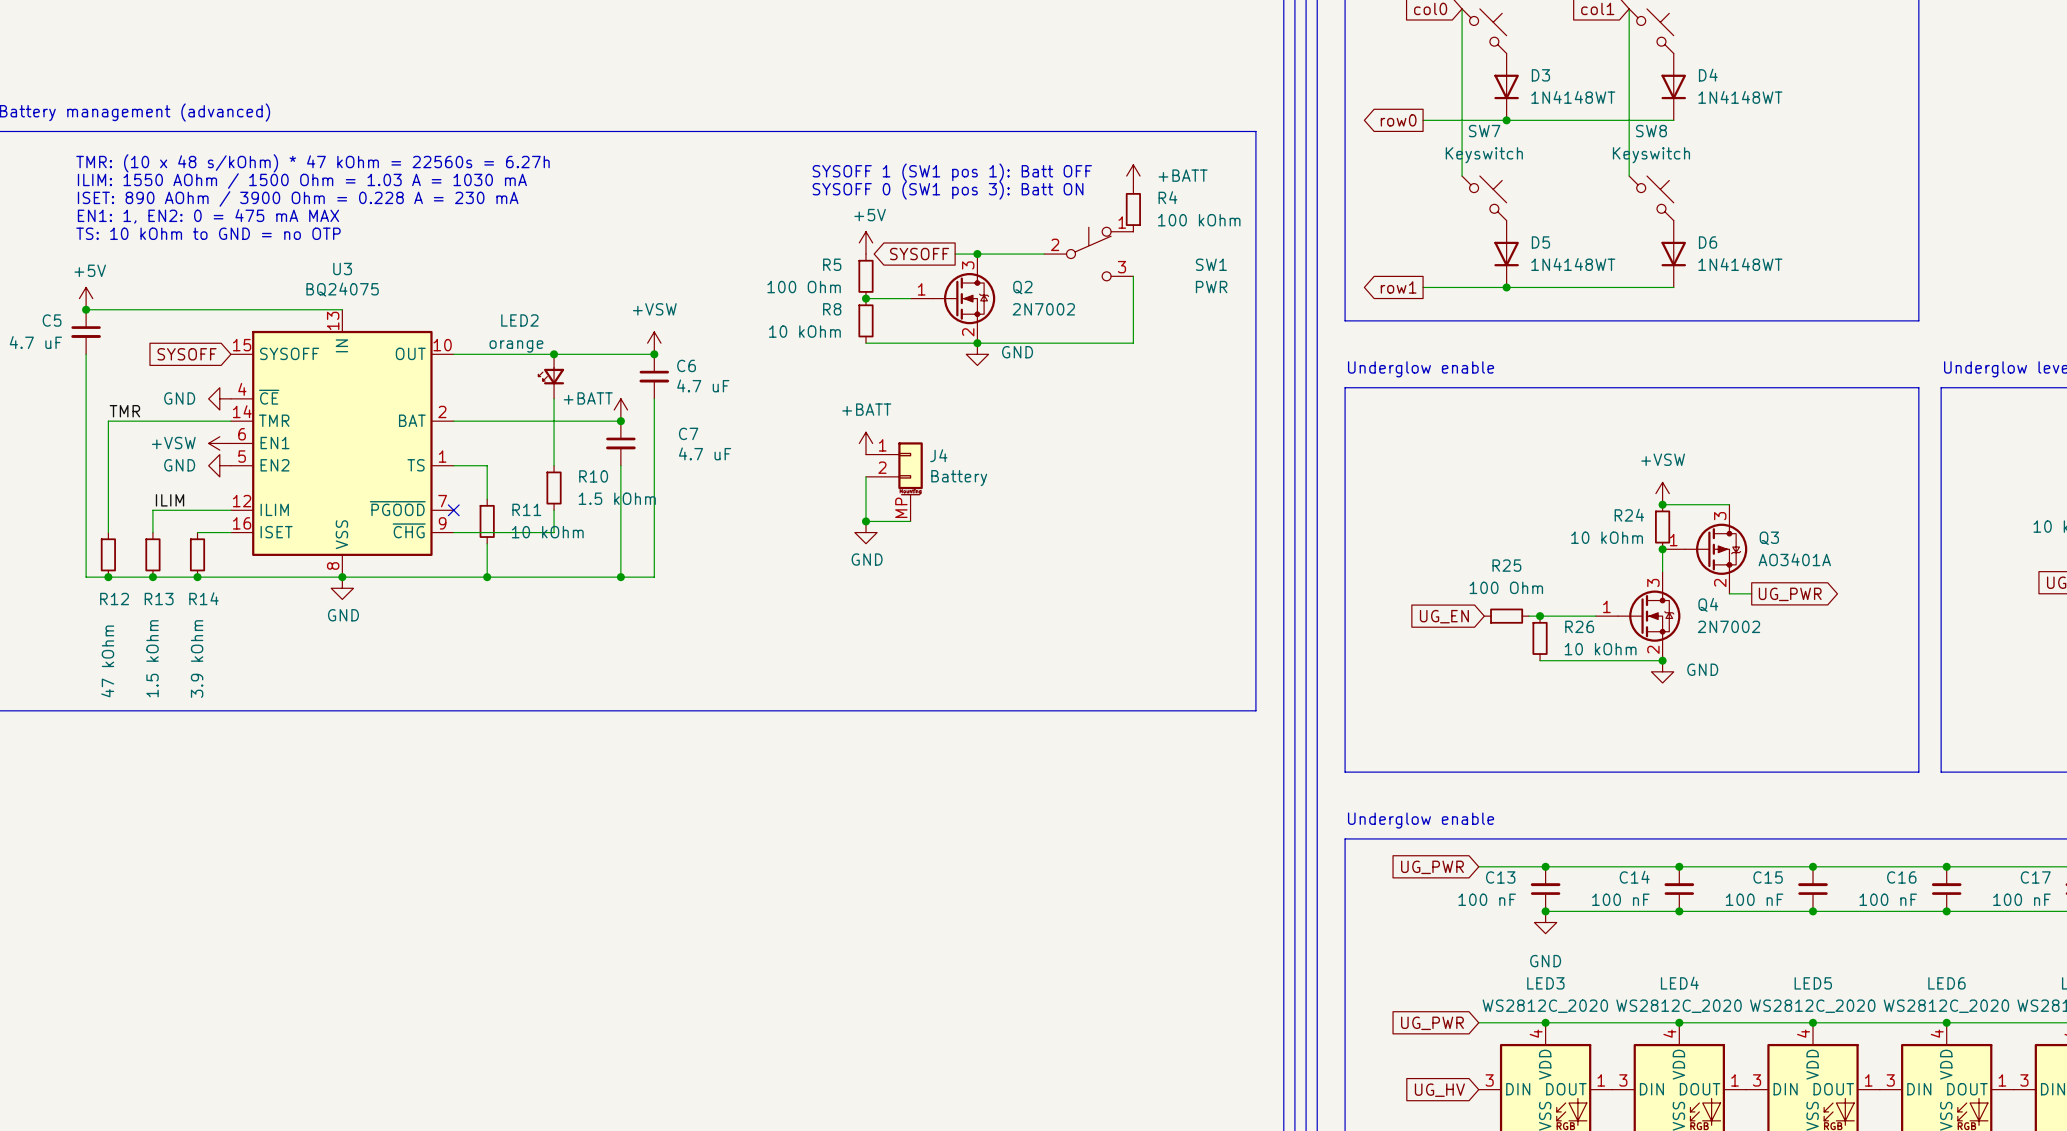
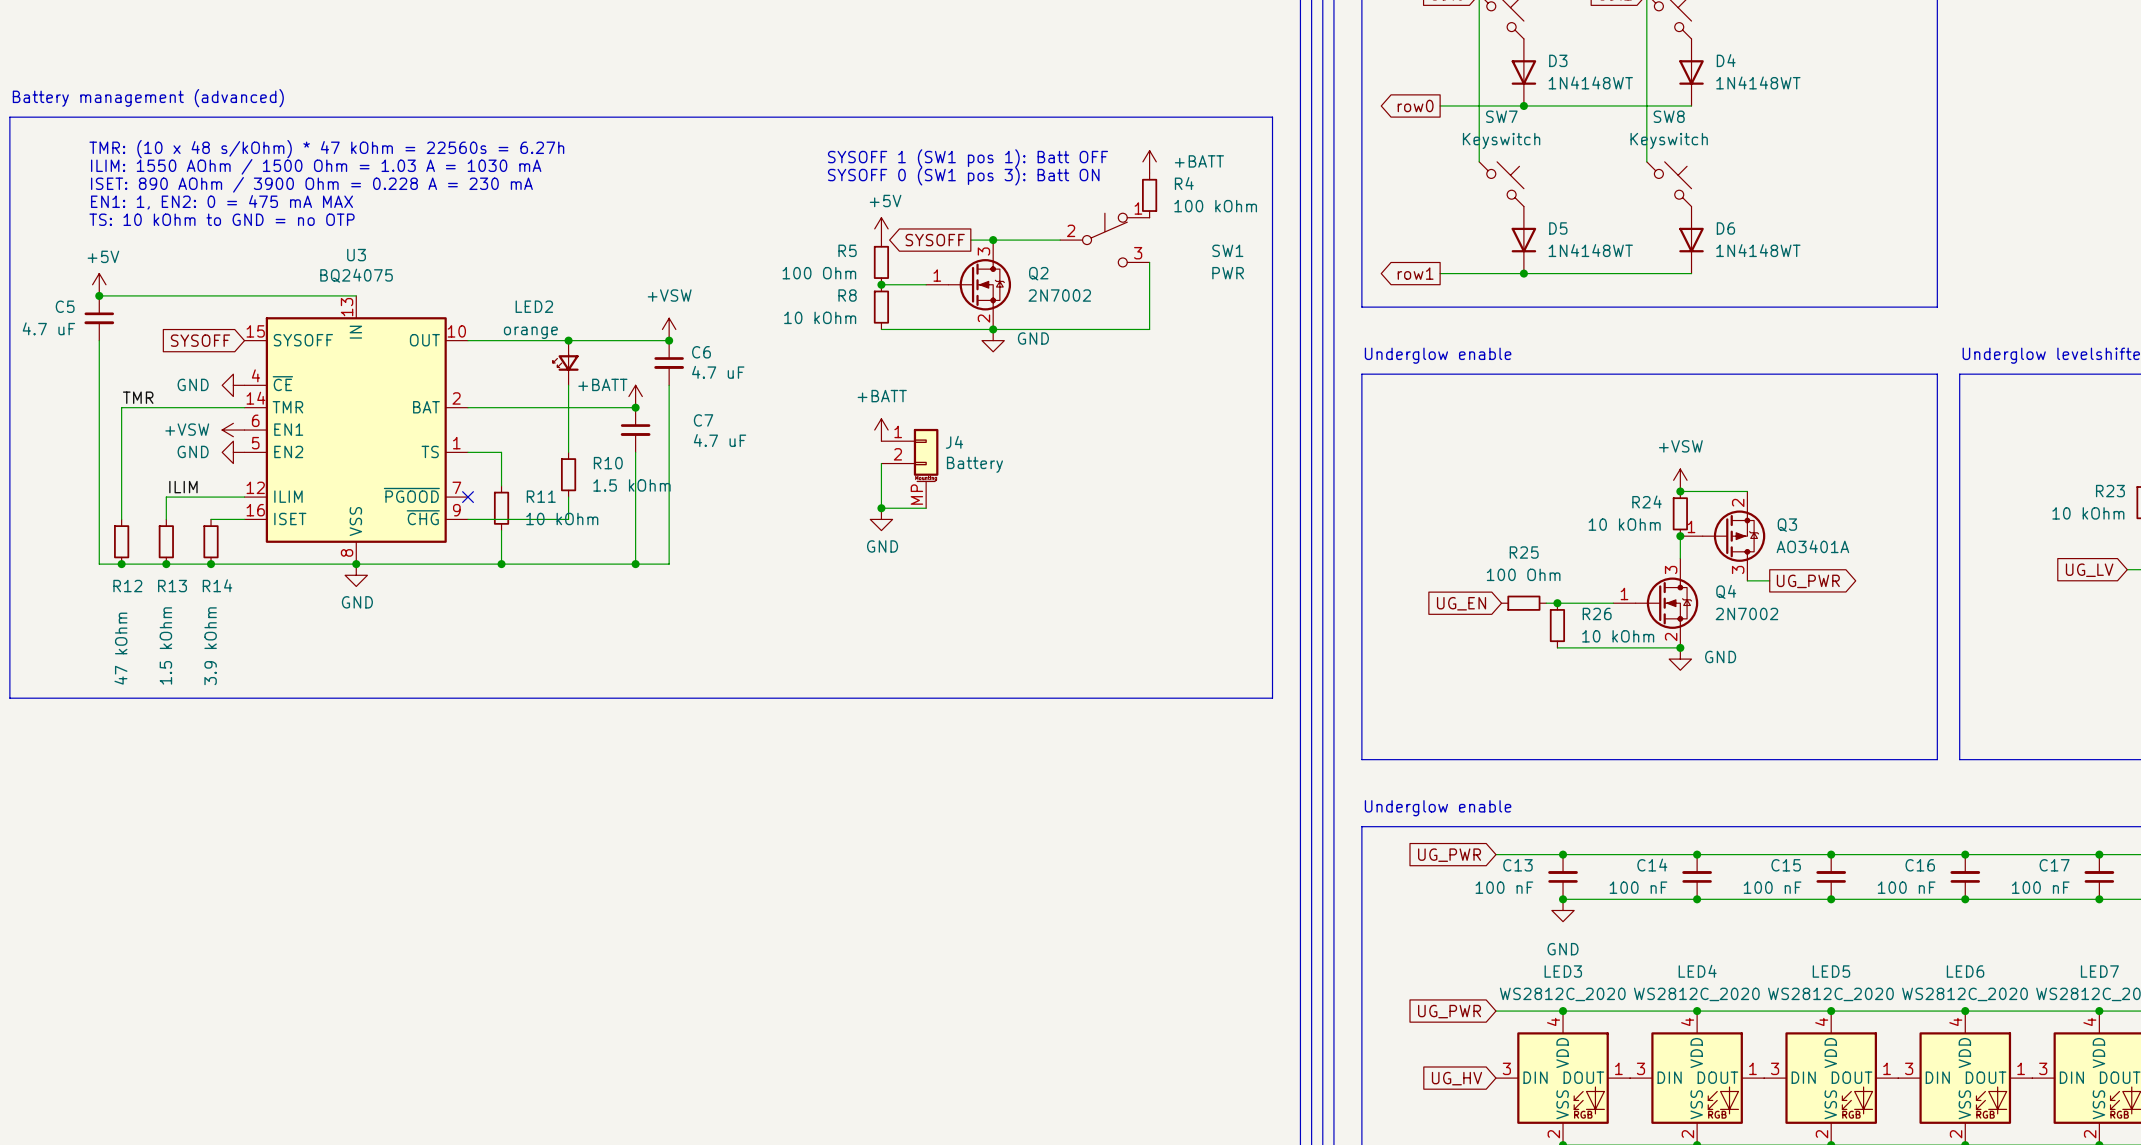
Q3 flip: as is (1716, 549) -> up-down (1733, 536)

